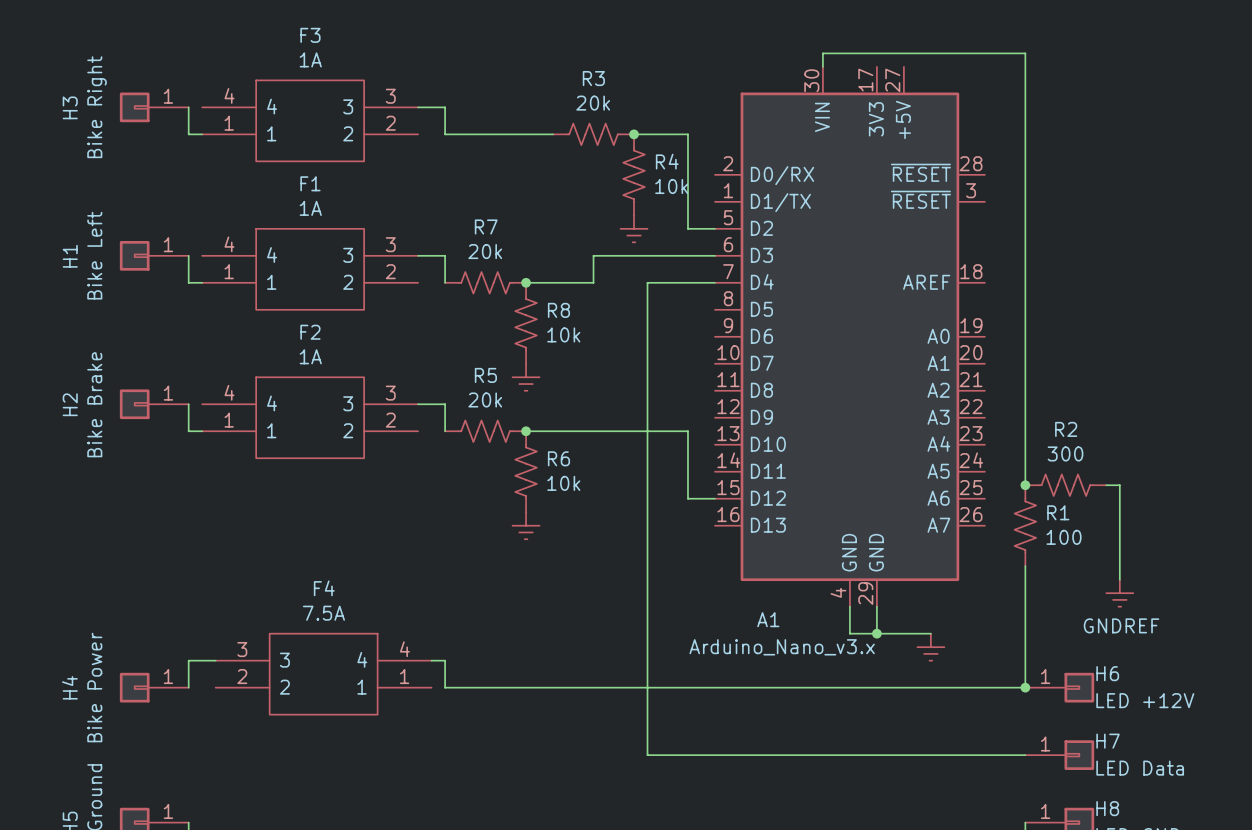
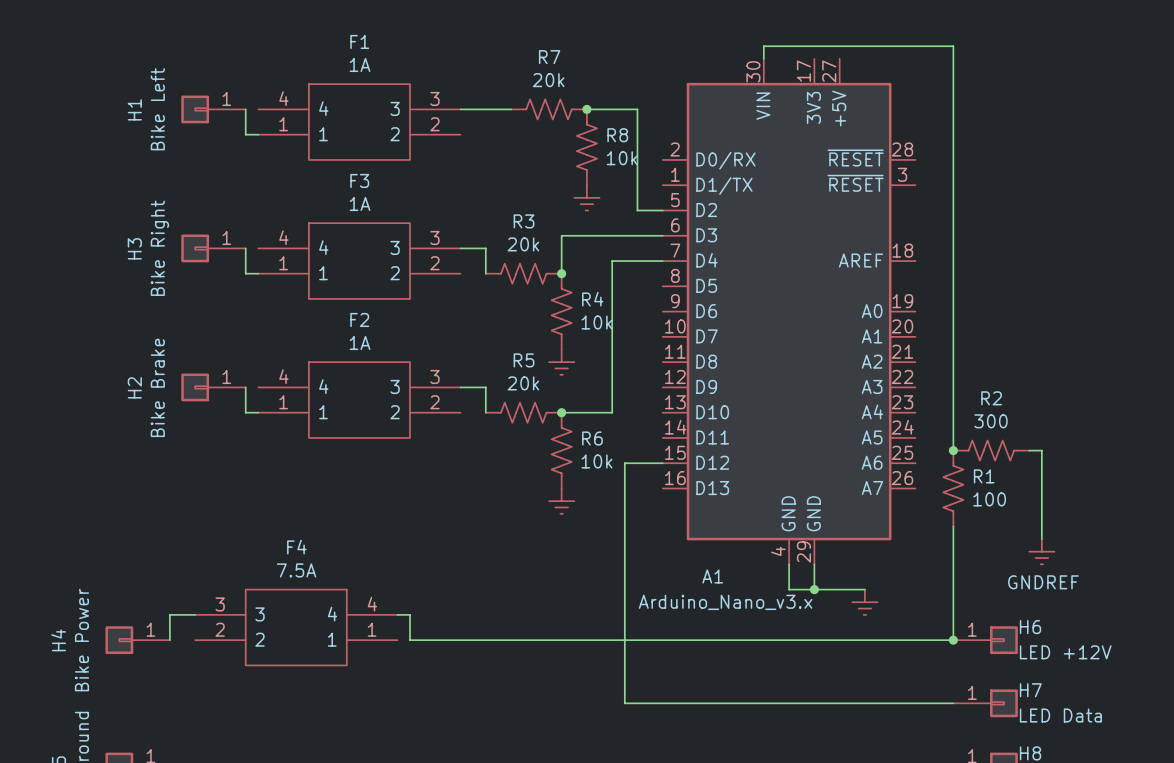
H3 position: (154, 107) -> (213, 248)
wire: (188, 107) (188, 134) (202, 134) -> (245, 109) (245, 134) (258, 134)
wire: (418, 107) (445, 107) (445, 134) (553, 134) -> none
F3 position: (310, 120) -> (359, 261)
wire: none -> (460, 109) (511, 109)
R3 position: (593, 134) -> (523, 273)
wire: (634, 134) (687, 134) -> (586, 109) (637, 109) (637, 122)
junction position: (634, 134) -> (586, 109)
R4 position: (634, 174) -> (561, 311)
power symbol position: (634, 228) -> (586, 197)
H1 position: (154, 255) -> (213, 109)
wire: (188, 255) (188, 282) (202, 282) -> (245, 248) (245, 273) (258, 273)
wire: (418, 255) (445, 255) (445, 282) -> (460, 248) (485, 248) (485, 273)
wire: (607, 255) (593, 255) (593, 282) (526, 282) -> (561, 235) (561, 273)
F1 position: (310, 269) -> (359, 122)
R7 position: (485, 282) -> (549, 109)
junction: (526, 282) -> none
wire: (661, 282) (647, 282) (647, 755) (674, 755) -> (637, 463) (624, 463) (624, 703)
wire: none -> (612, 261) (612, 412) (561, 412)
junction: none -> (561, 273)
R8 position: (526, 323) -> (586, 147)
power symbol: (526, 377) -> none
power symbol: none -> (561, 362)
H2 position: (154, 404) -> (213, 387)
wire: (188, 404) (188, 431) (202, 431) -> (245, 387) (245, 412) (258, 412)
wire: (418, 404) (445, 404) (445, 431) -> (460, 387) (485, 387) (485, 412)
F2 position: (310, 417) -> (359, 400)
R5 position: (485, 431) -> (523, 412)
wire: (526, 431) (687, 431) (687, 498) -> none
junction: (526, 431) -> none
junction: none -> (561, 412)
R6 position: (526, 471) -> (561, 450)
power symbol: (526, 525) -> none
power symbol: none -> (561, 501)

